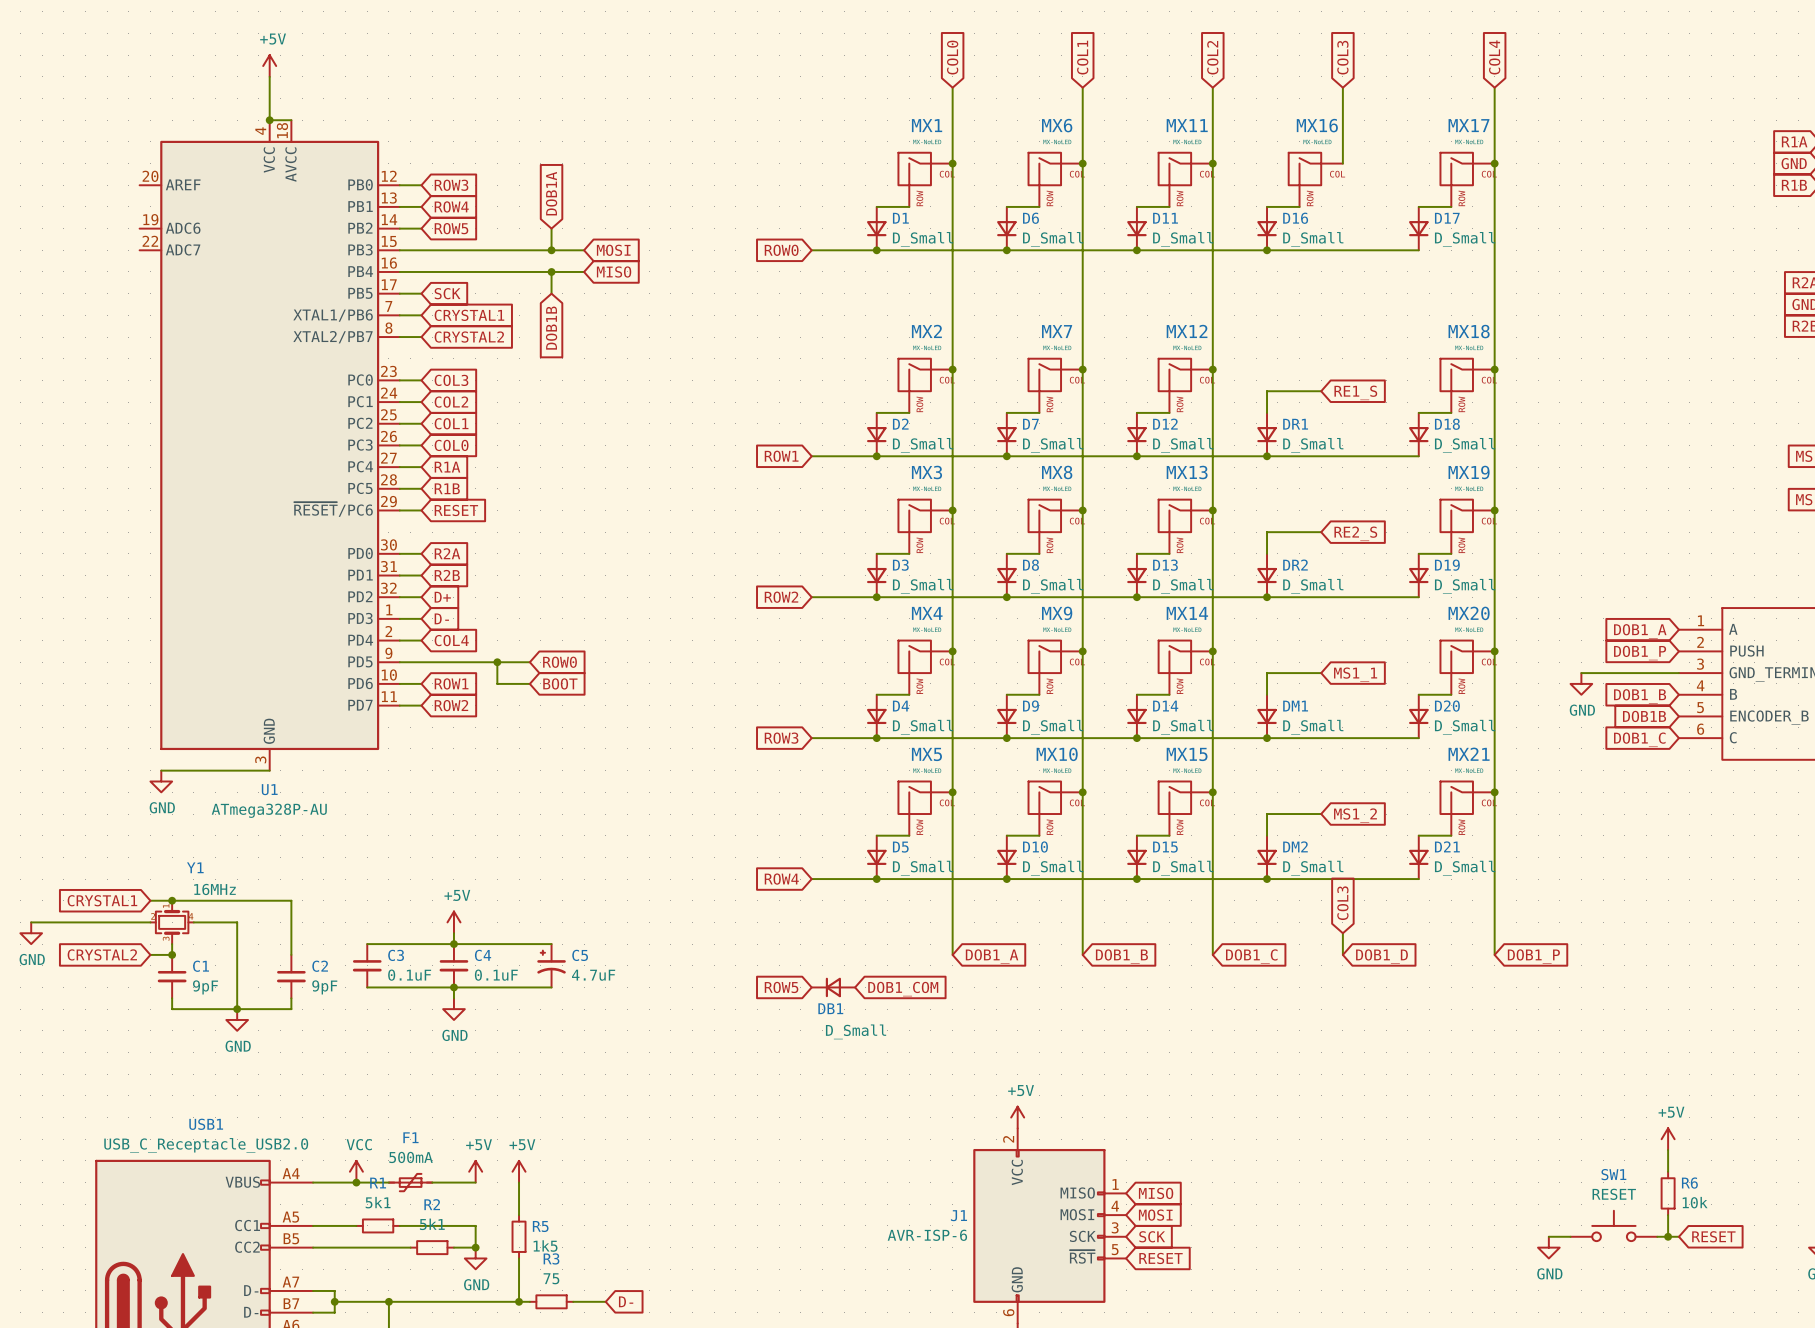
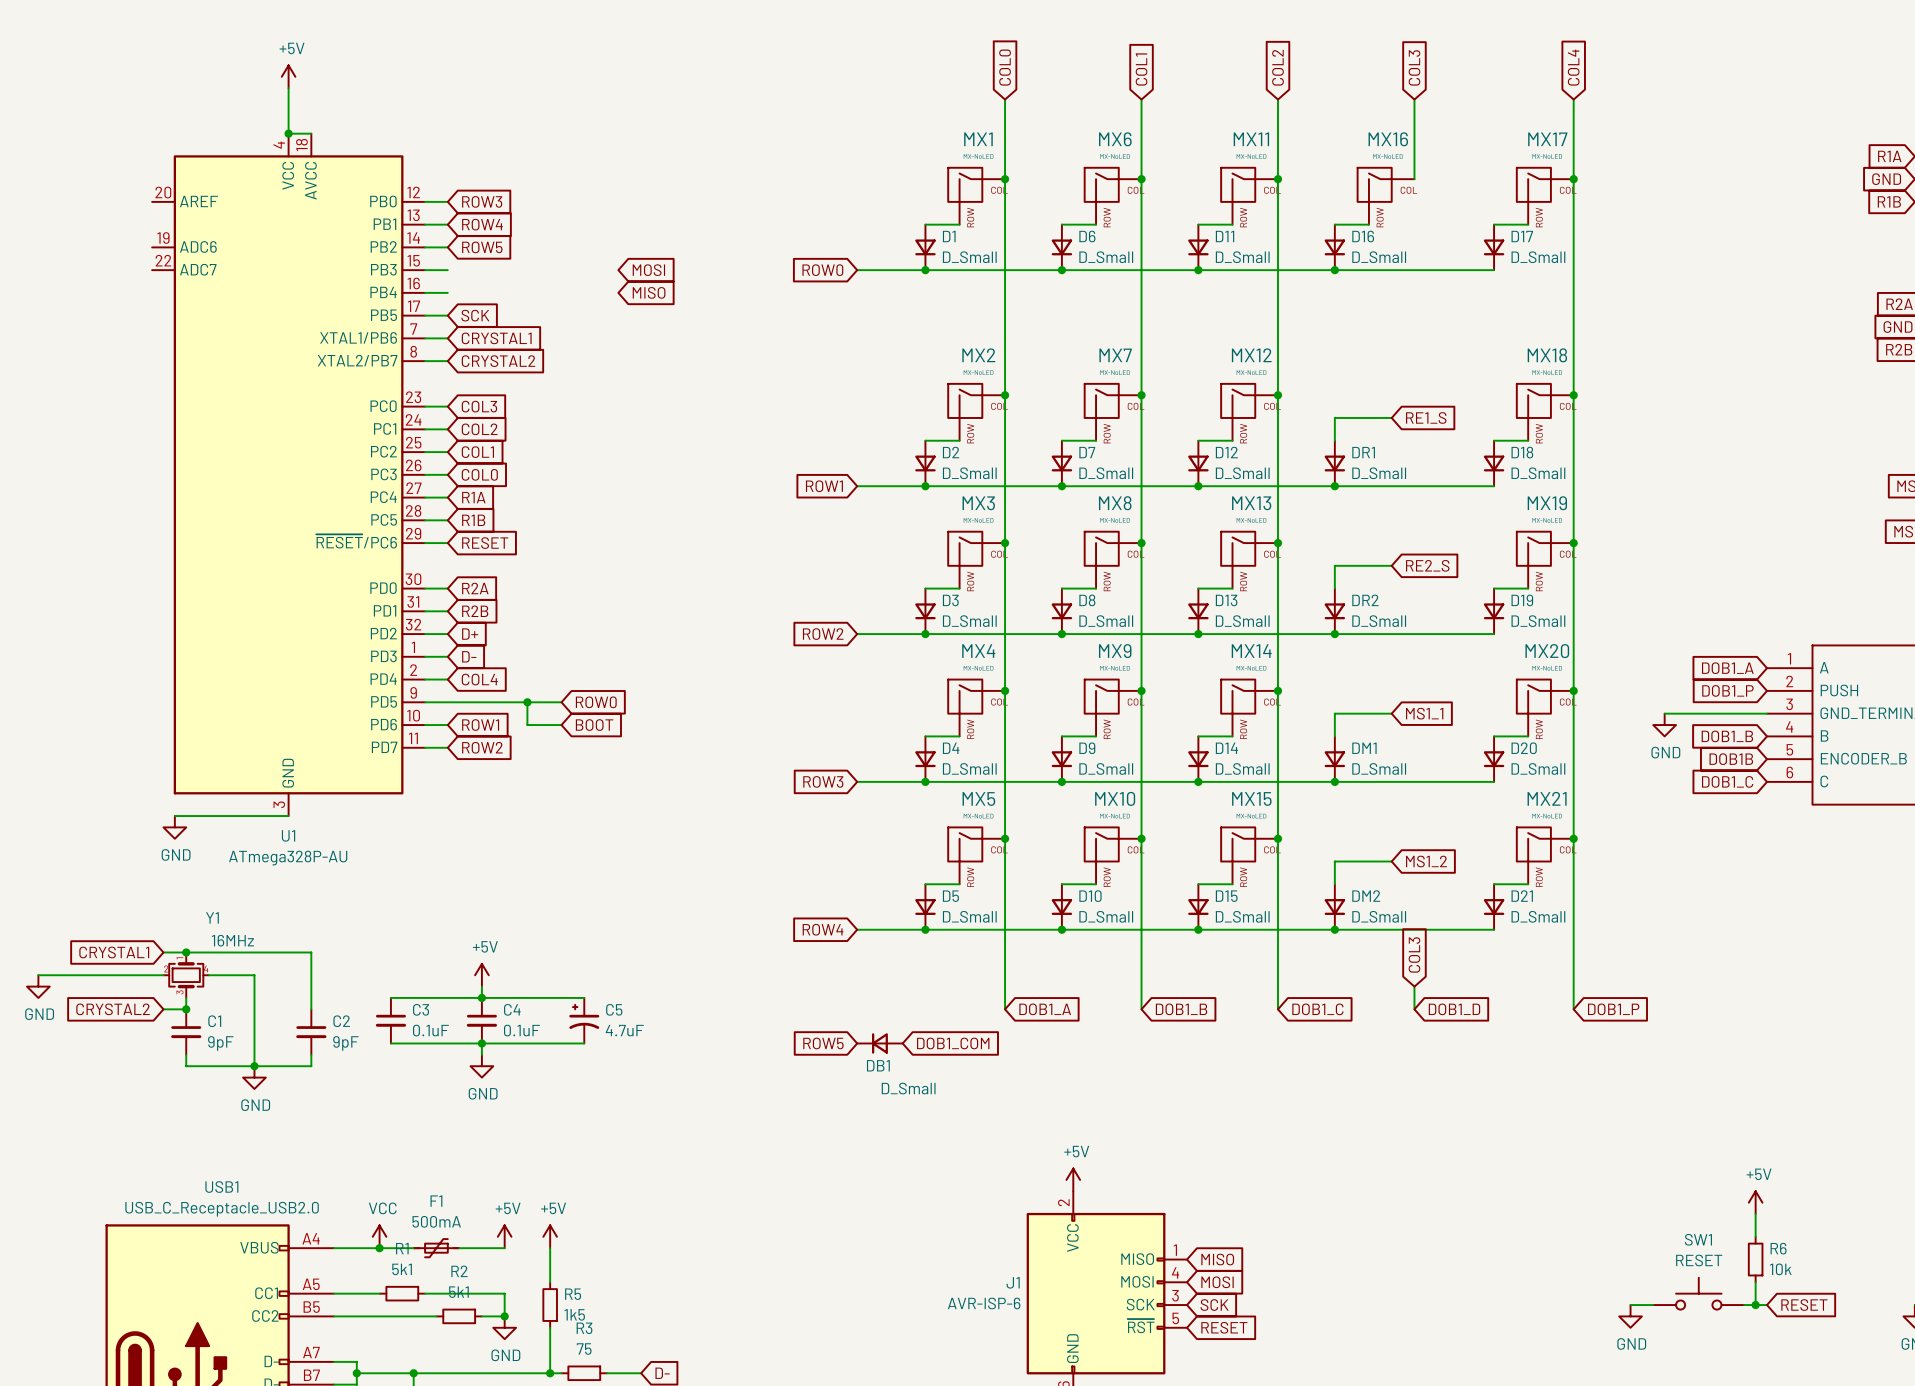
global label: DOB1A (551, 193) -> none
wire: (551, 228) (551, 250) -> none
wire: (421, 250) (584, 250) -> none
junction: (551, 250) -> none
wire: (421, 271) (584, 271) -> none
wire: (551, 271) (551, 293) -> none
junction: (551, 271) -> none
global label: DOB1B (551, 328) -> none

